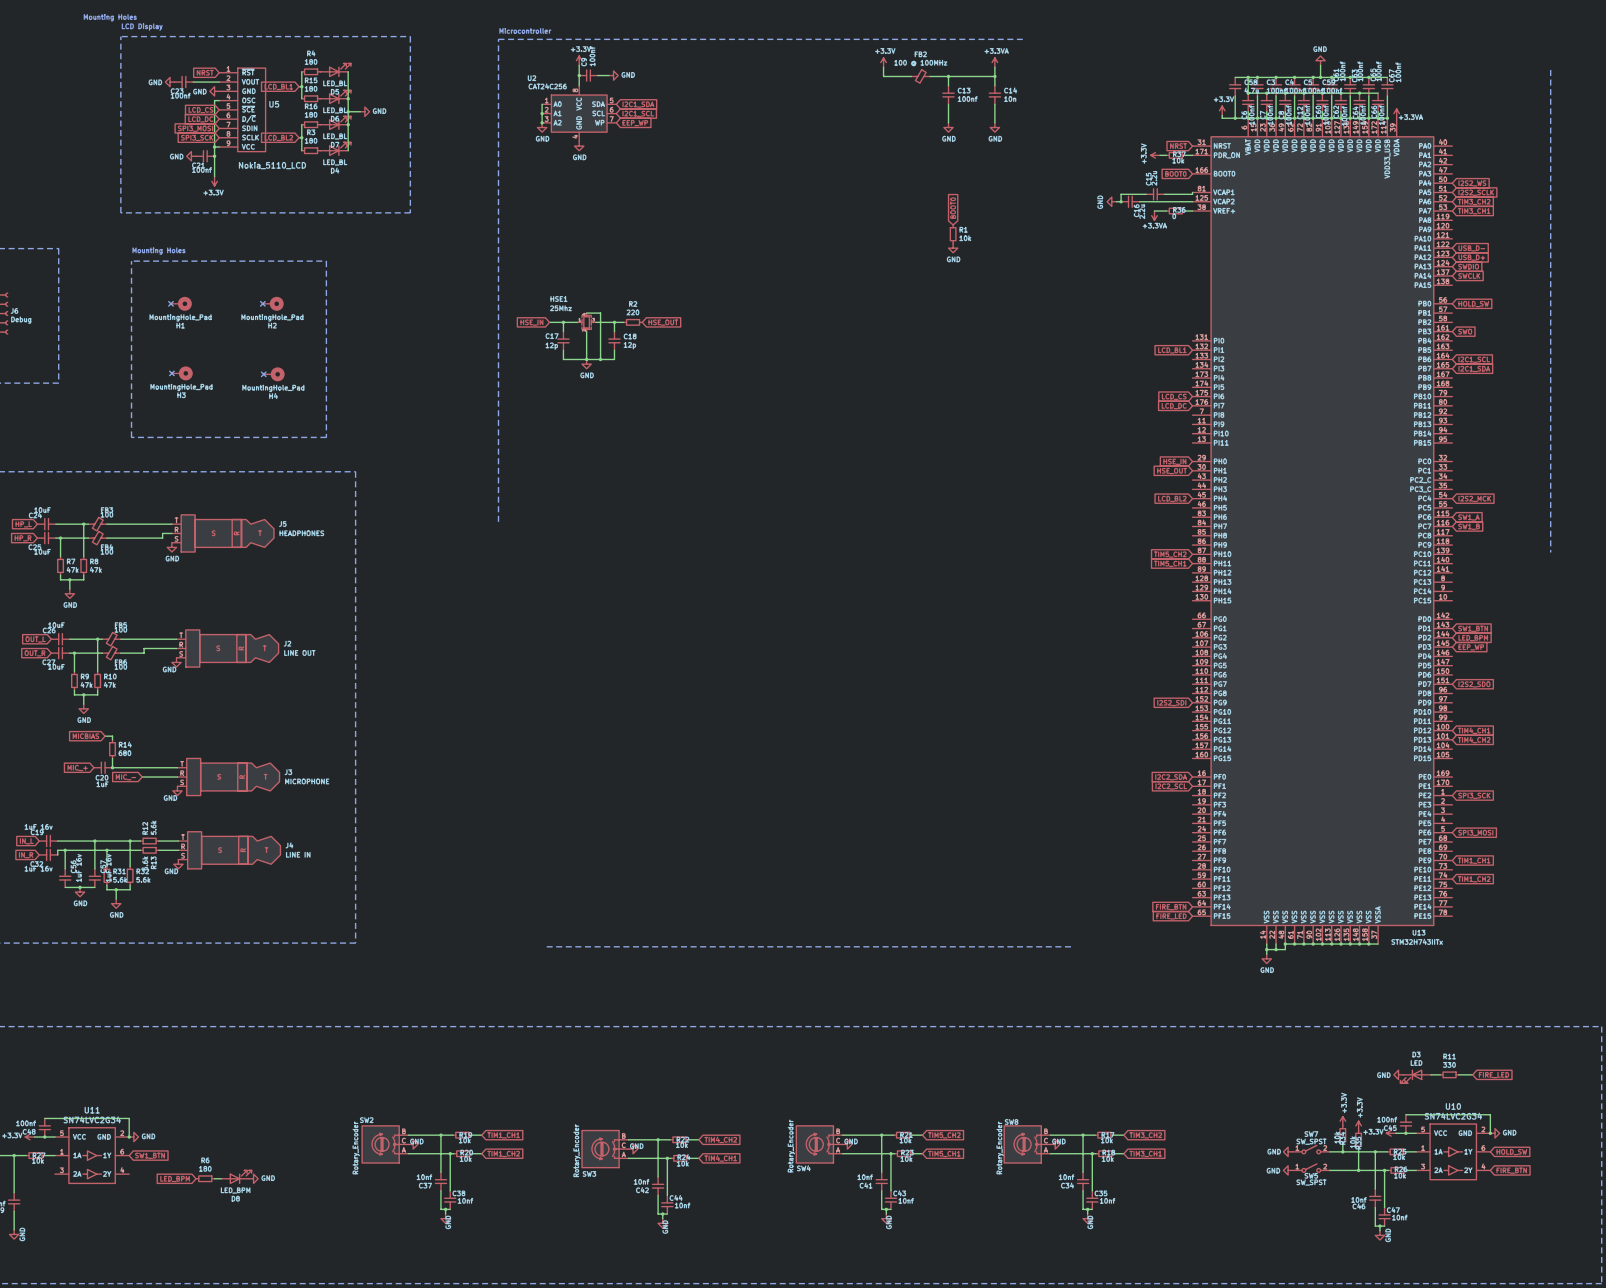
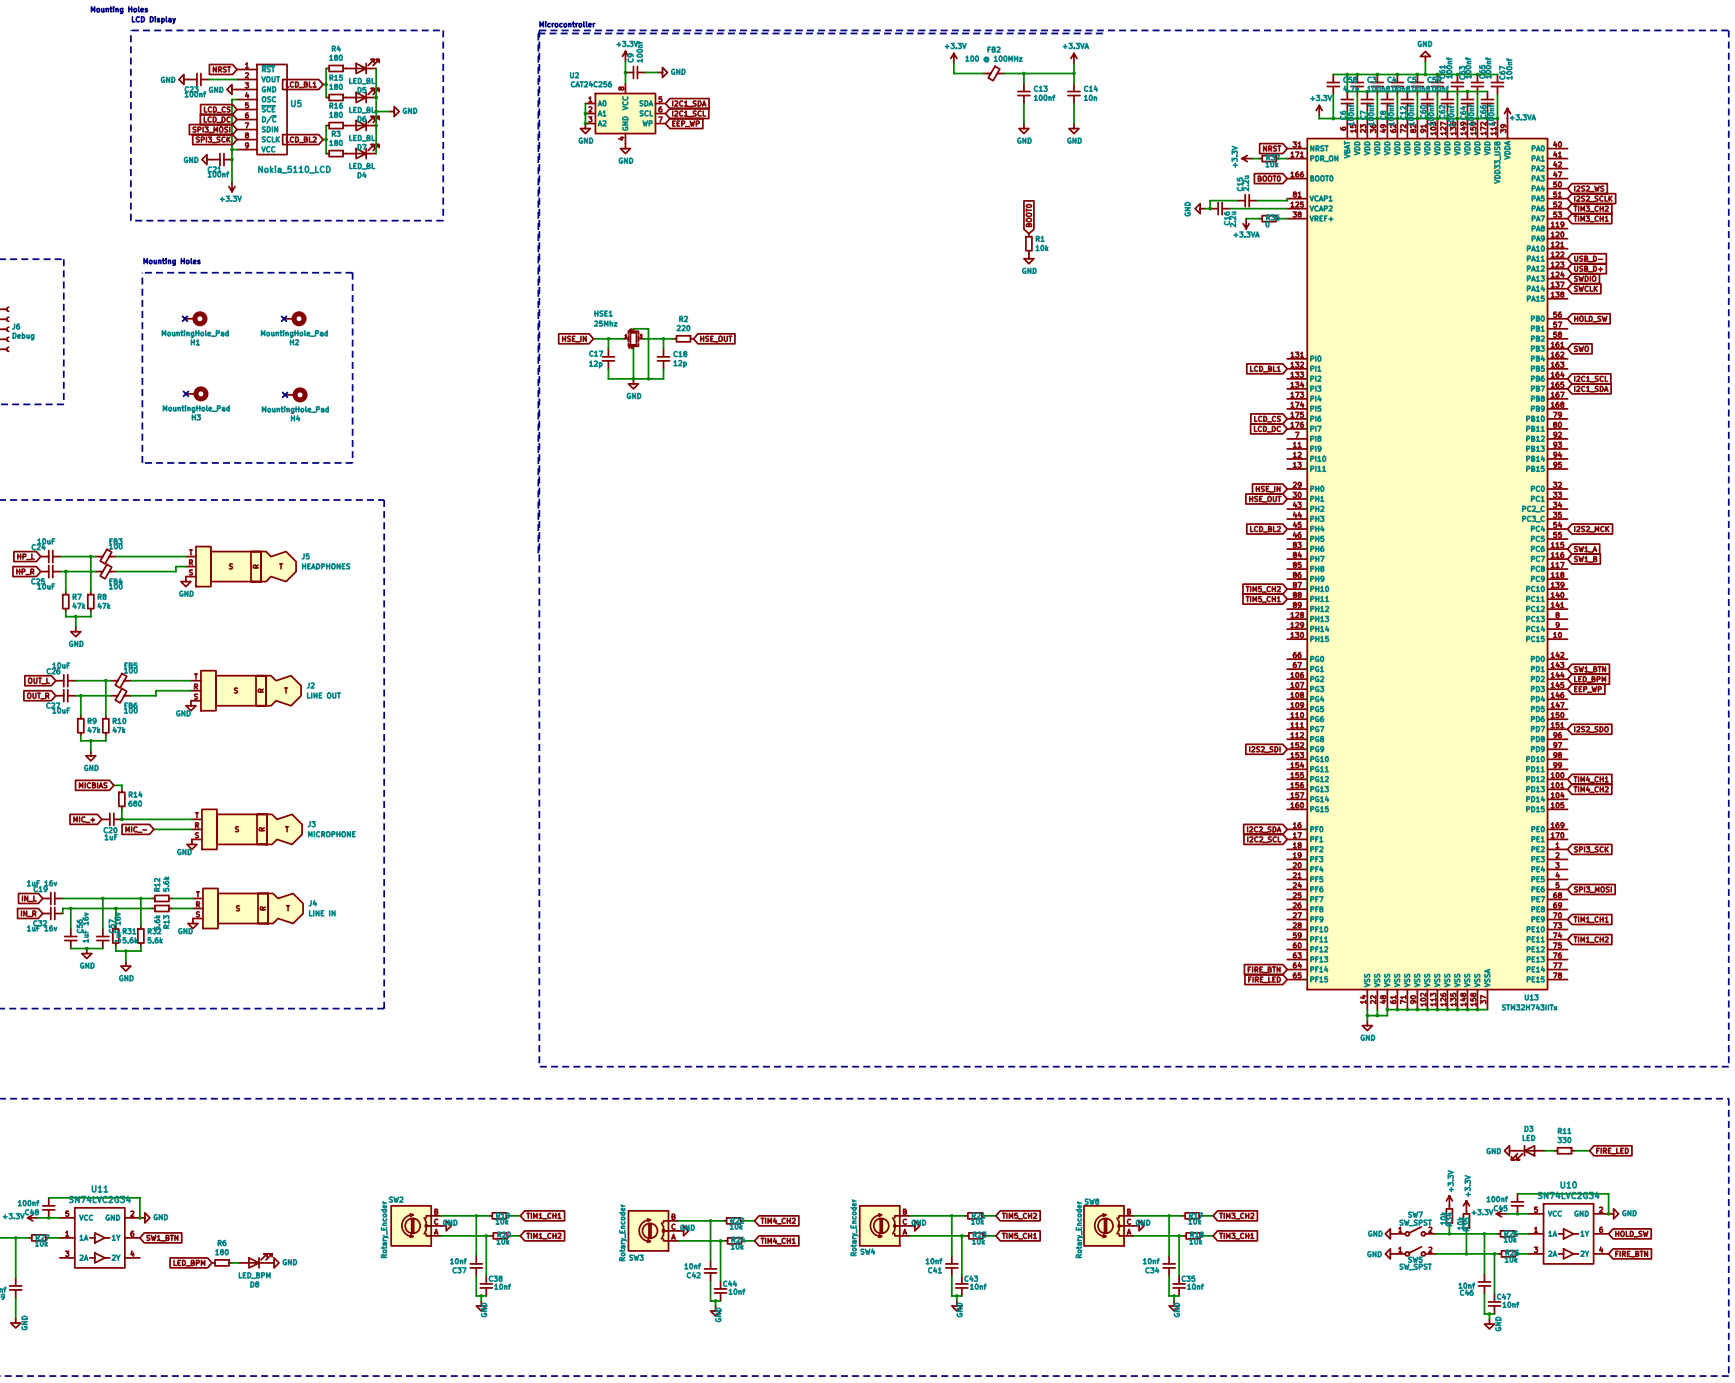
line: none -> (539, 30) (1728, 30) (1728, 1066) (539, 1066) (539, 30)
line: (1550, 69) (1550, 552) -> none
line: (546, 946) (1070, 946) -> none

